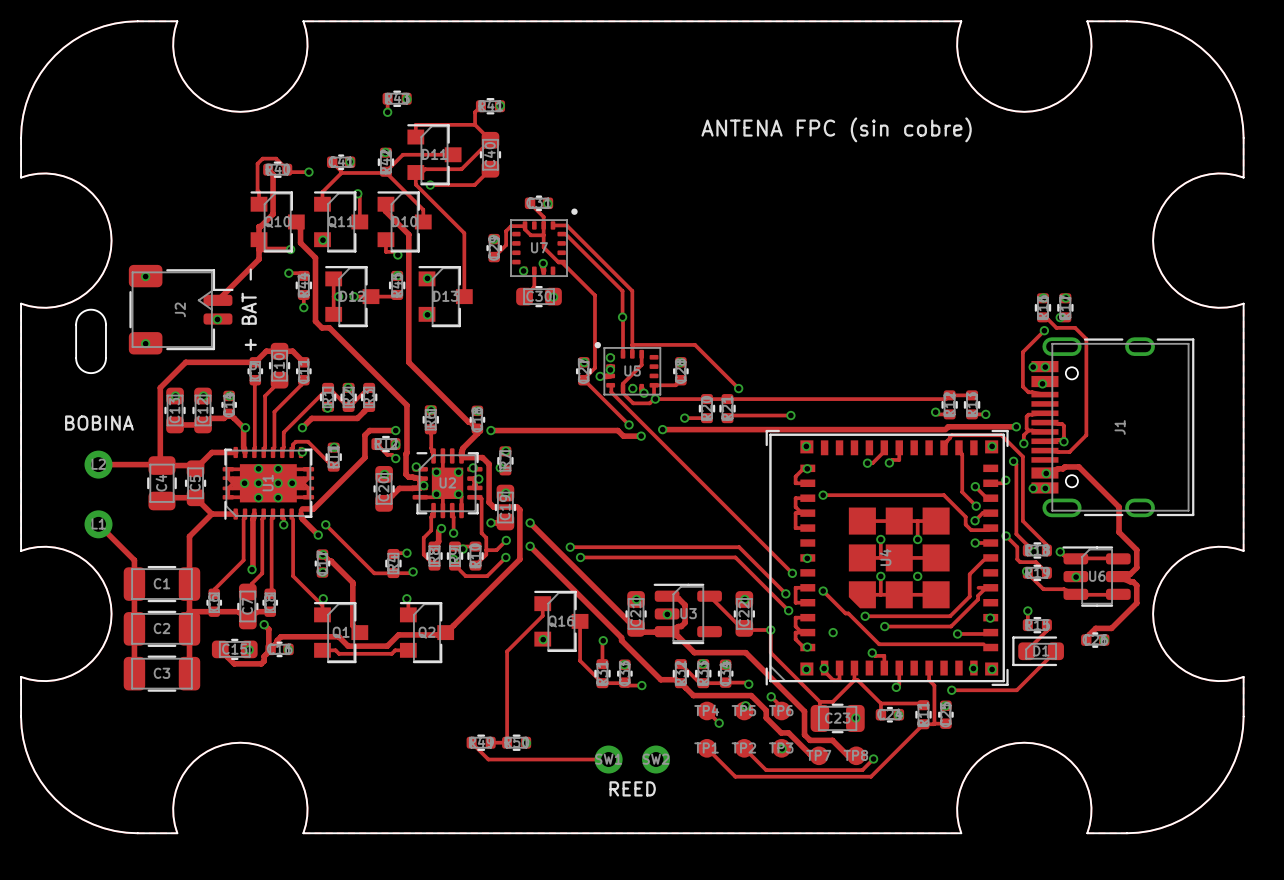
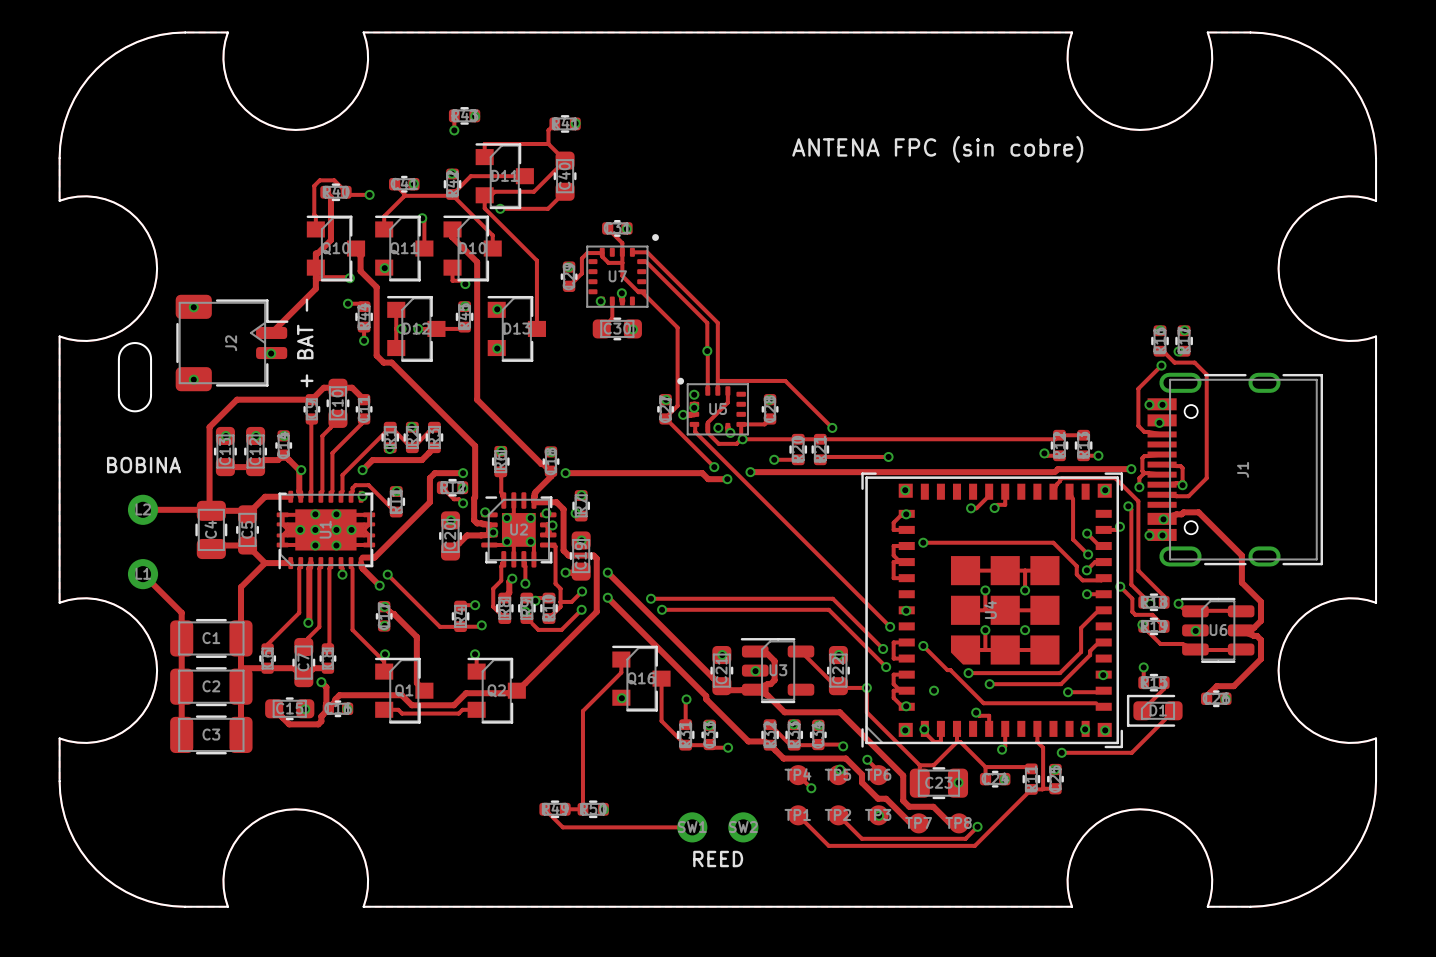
track: (978, 587) (990, 587) -> none

